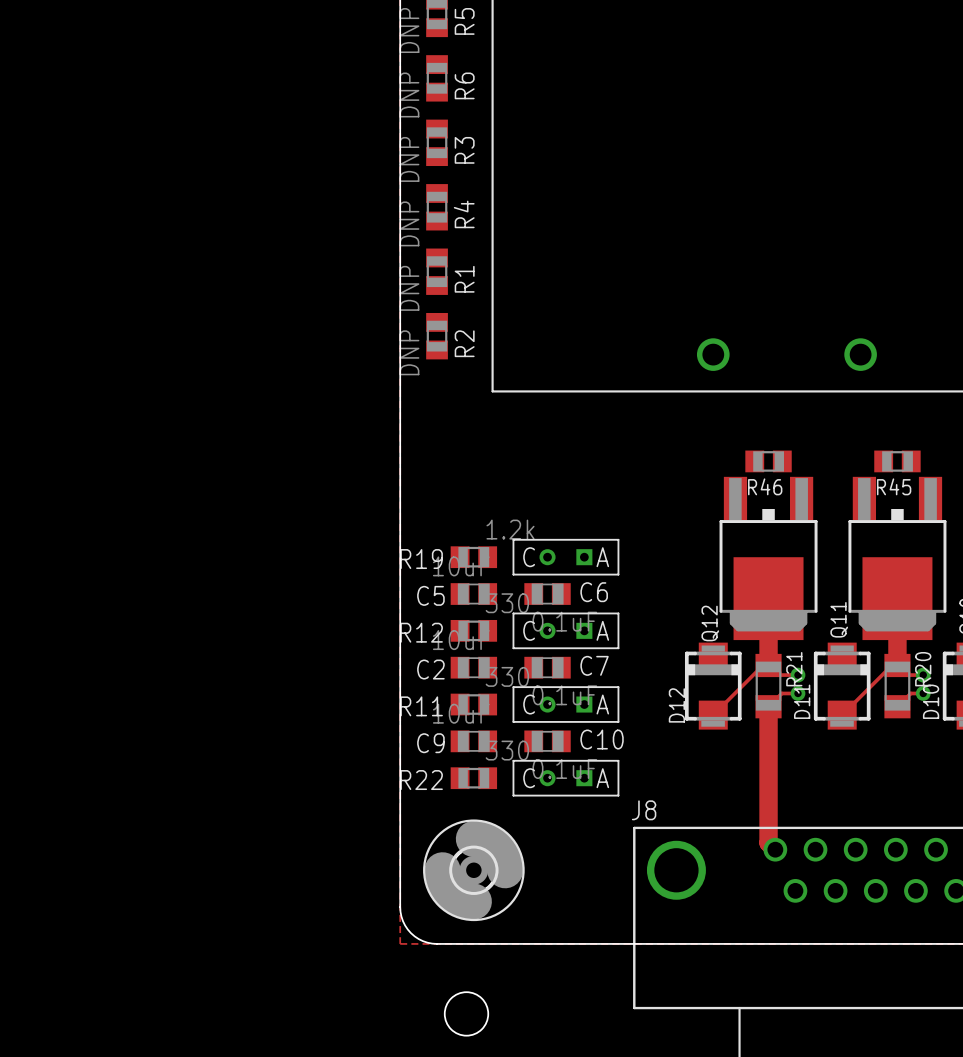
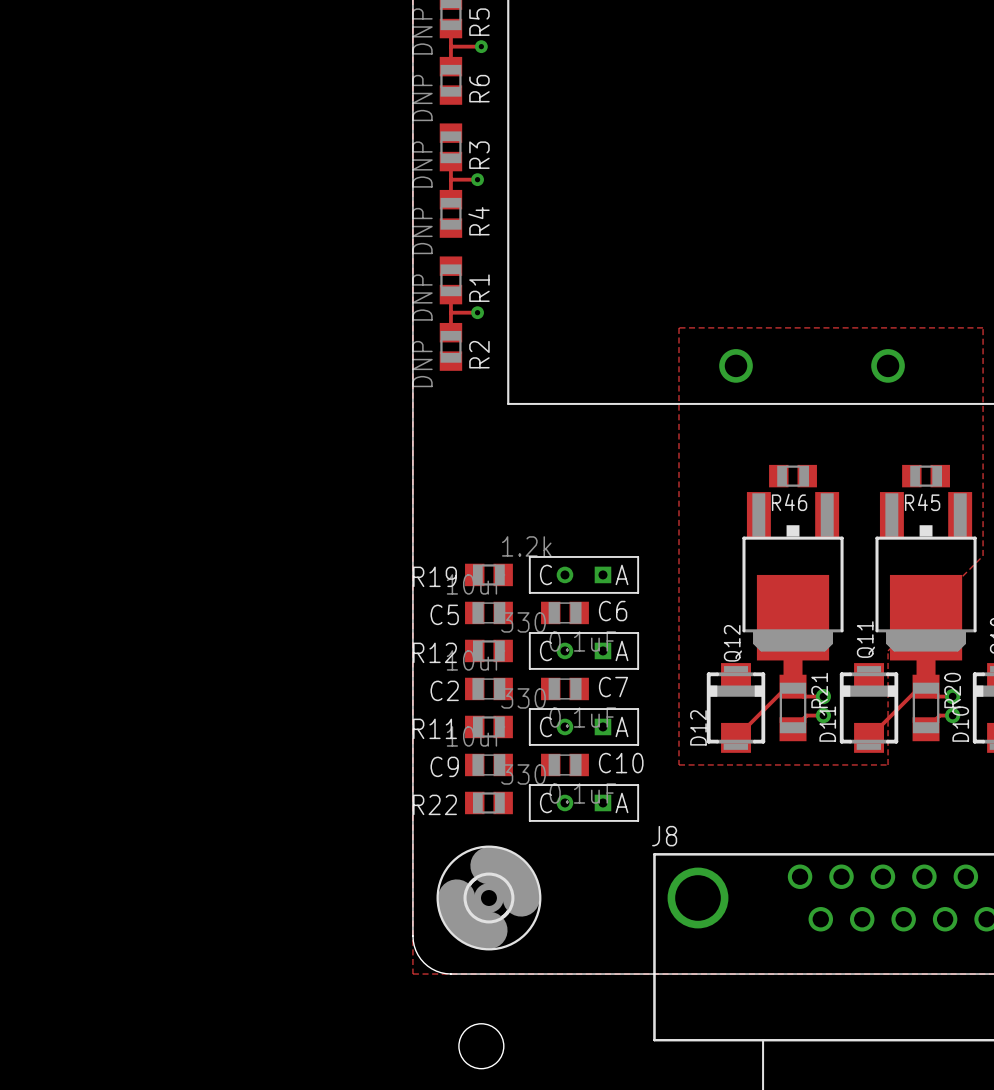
track: none -> (450, 28) (450, 66)
track: none -> (450, 46) (481, 46)
via: none -> (481, 46)
track: none -> (450, 161) (450, 199)
track: none -> (450, 179) (477, 179)
via: none -> (477, 179)
track: none -> (450, 294) (450, 332)
track: none -> (450, 312) (477, 312)
via: none -> (477, 312)
zone outline: none -> (679, 327) (679, 764) (888, 764) (888, 650) (983, 555) (983, 327) (679, 327)
track: (768, 706) (768, 842) (775, 849) -> none

